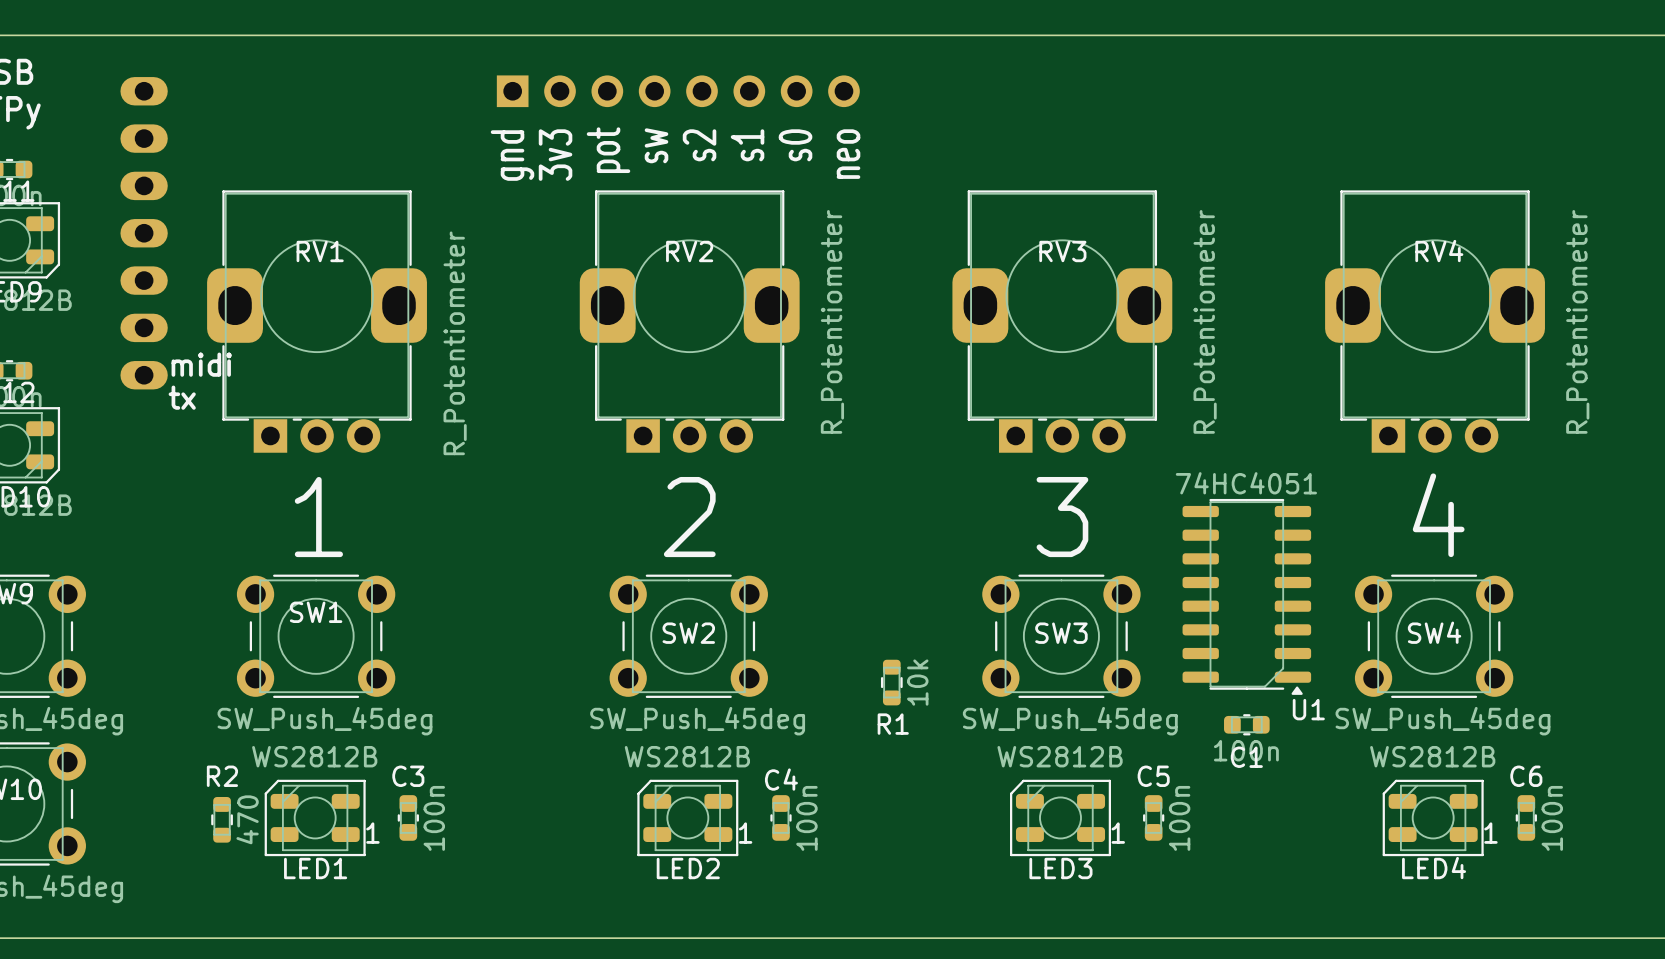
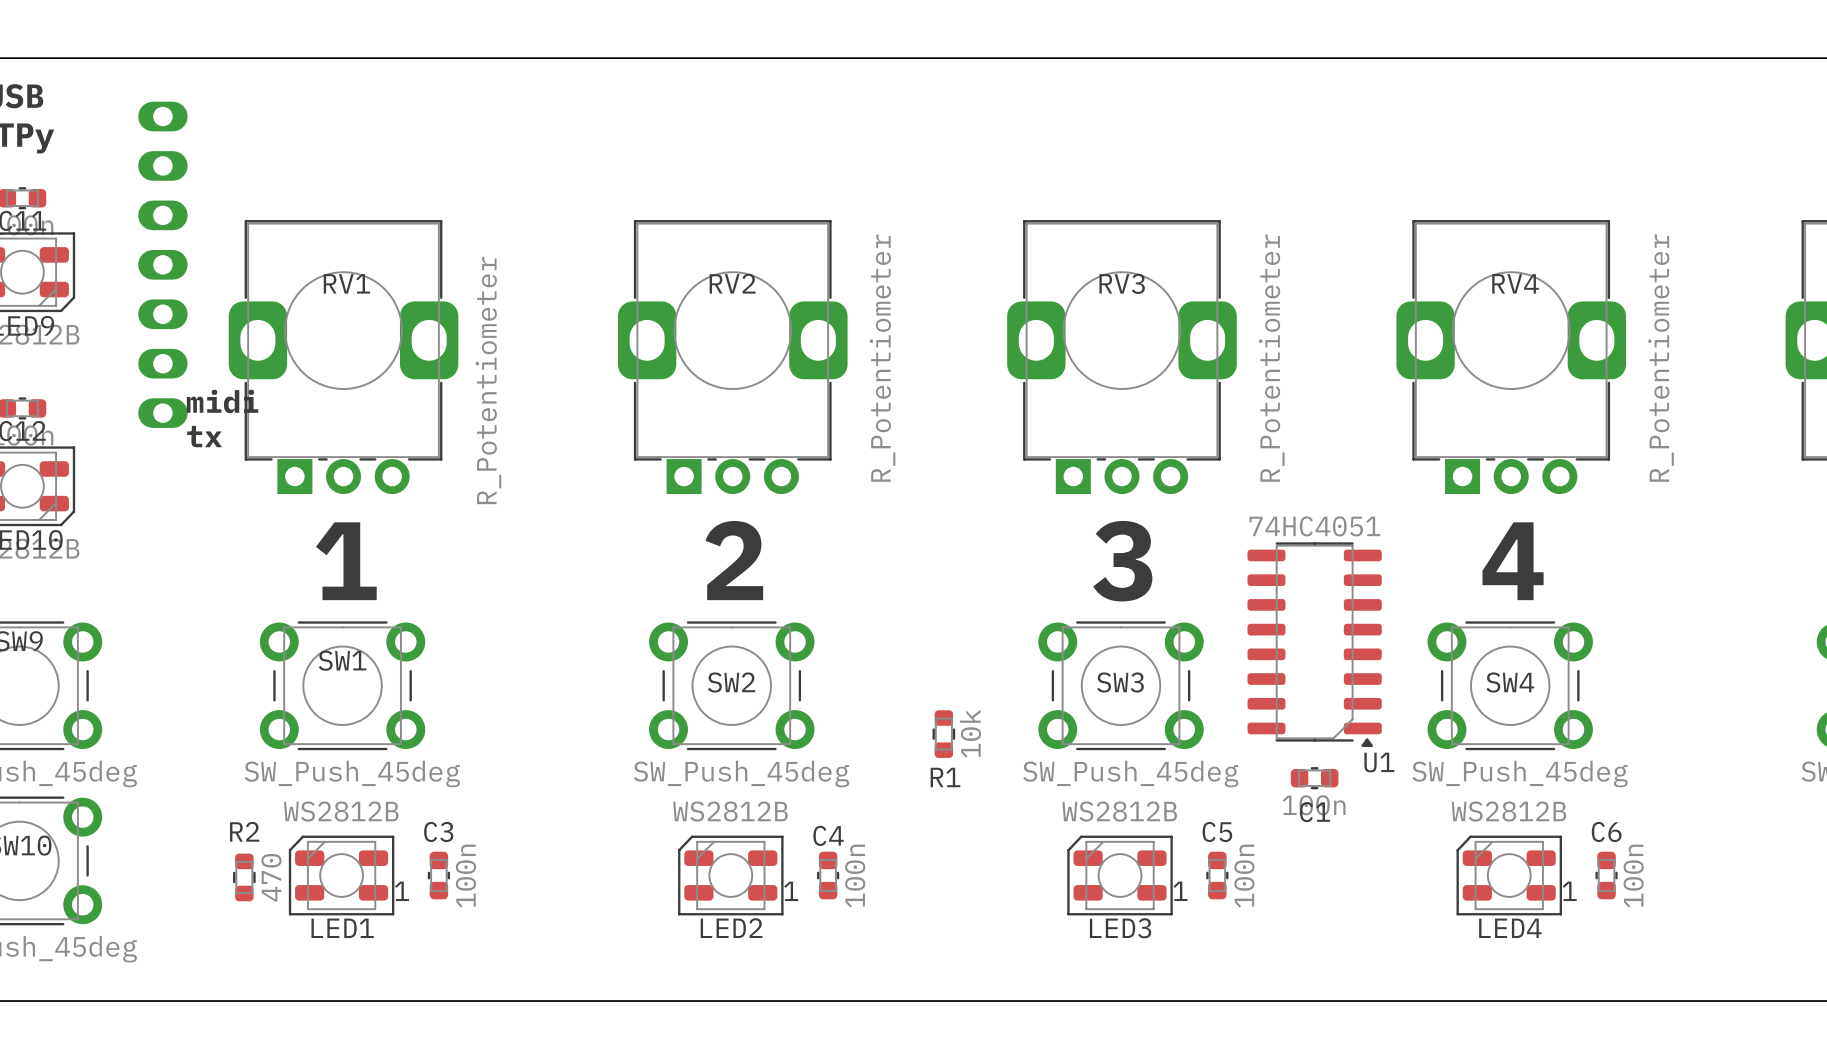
part: (678, 91) -> none
text: sw (656, 145) -> none
text: s2 (699, 145) -> none
text: s1 (747, 145) -> none
text: s0 (795, 145) -> none
text: pot (608, 150) -> none
text: neo (848, 154) -> none
text: gnd (512, 155) -> none
text: 3v3 (555, 155) -> none

